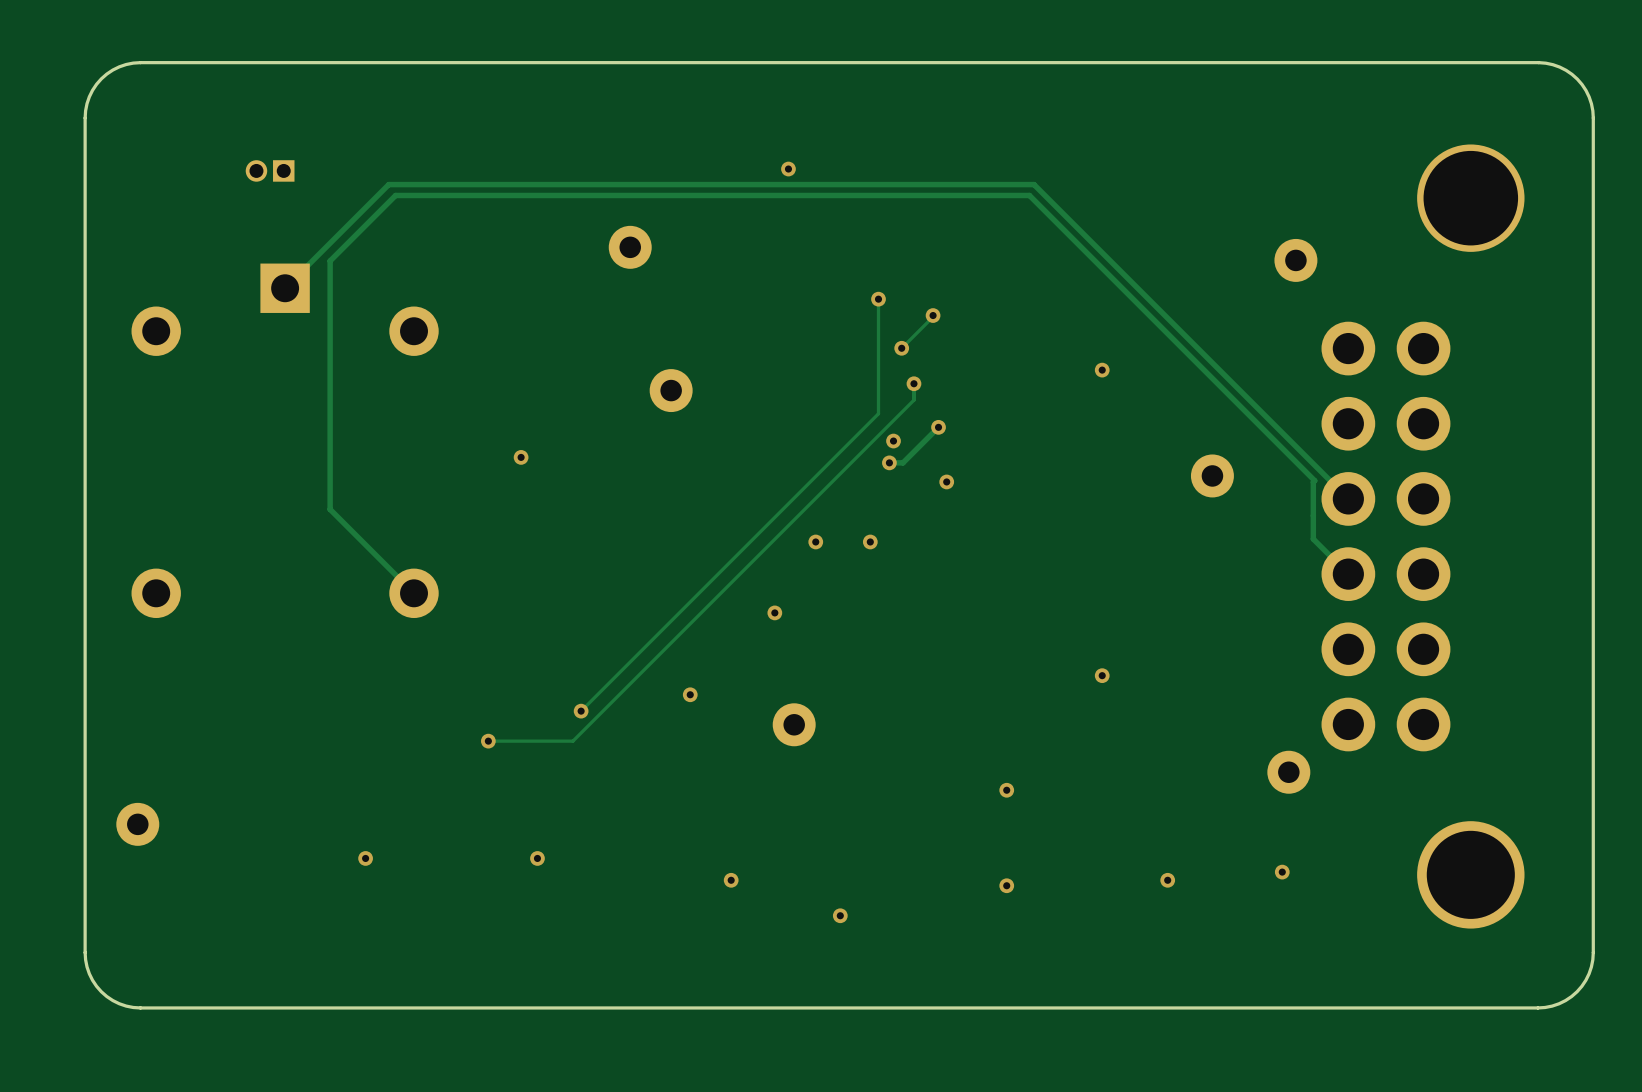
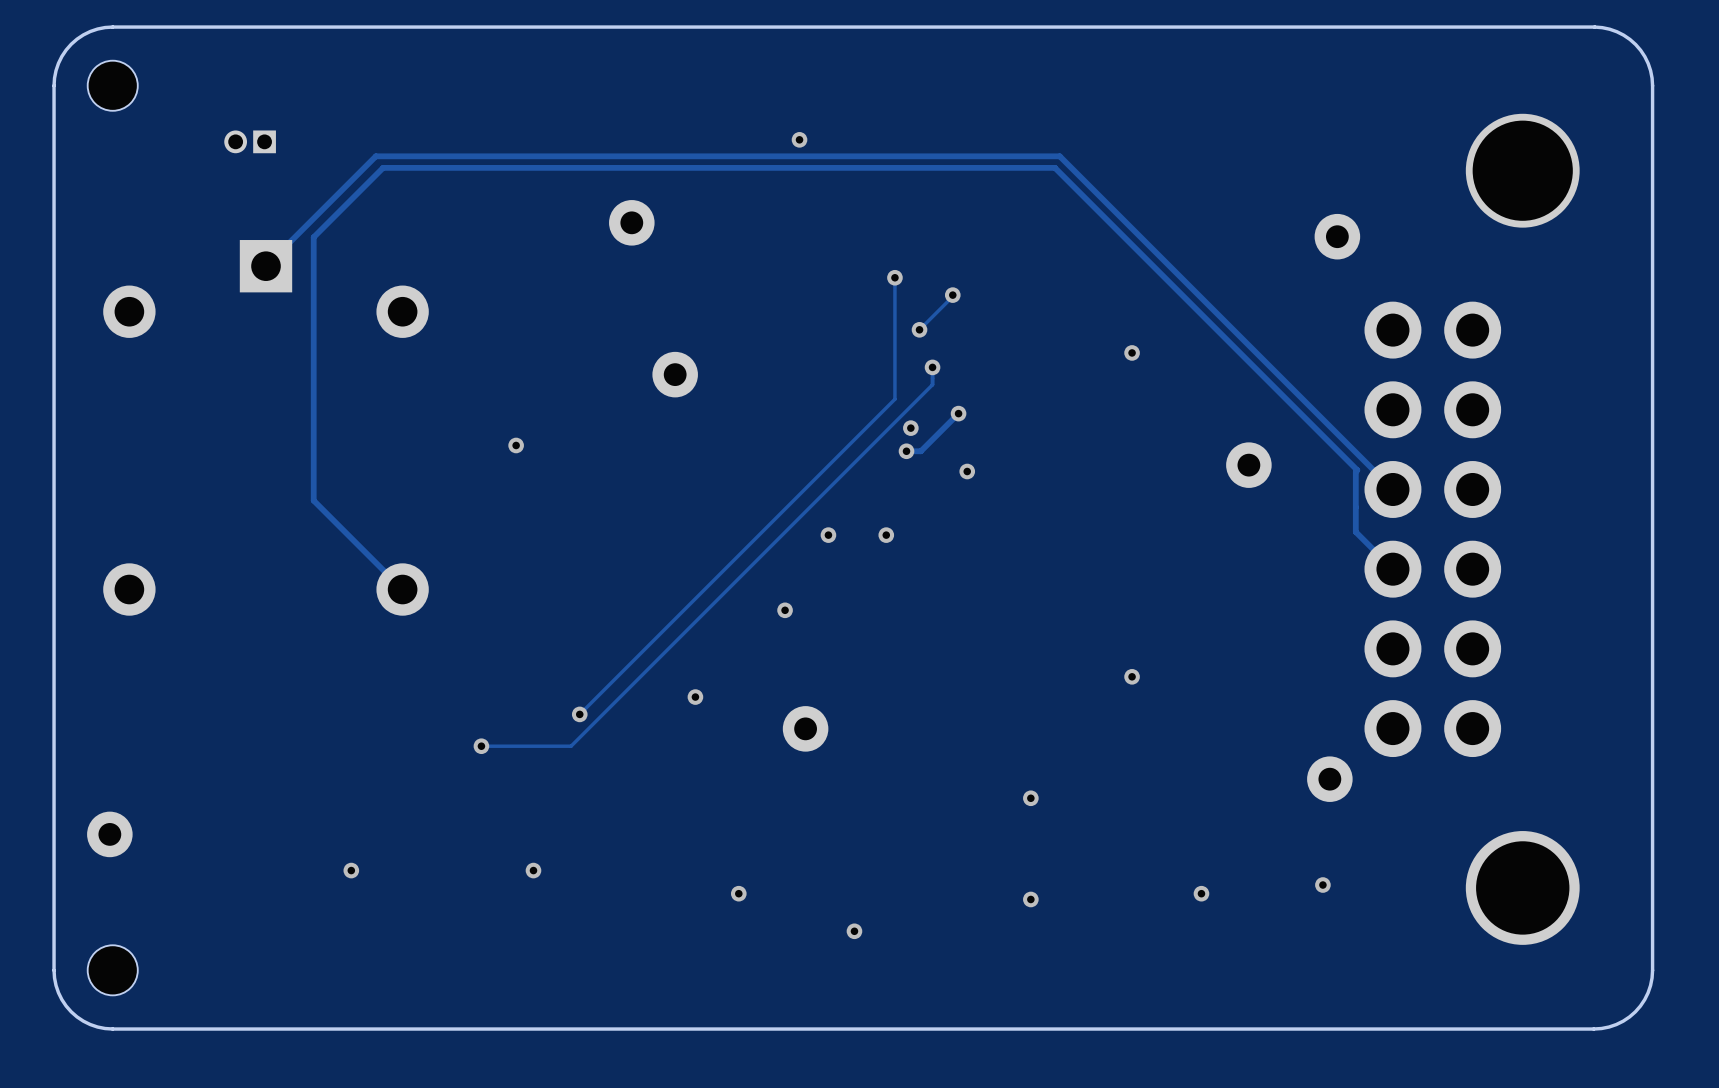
part: none -> (112, 85)
part: none -> (112, 970)

